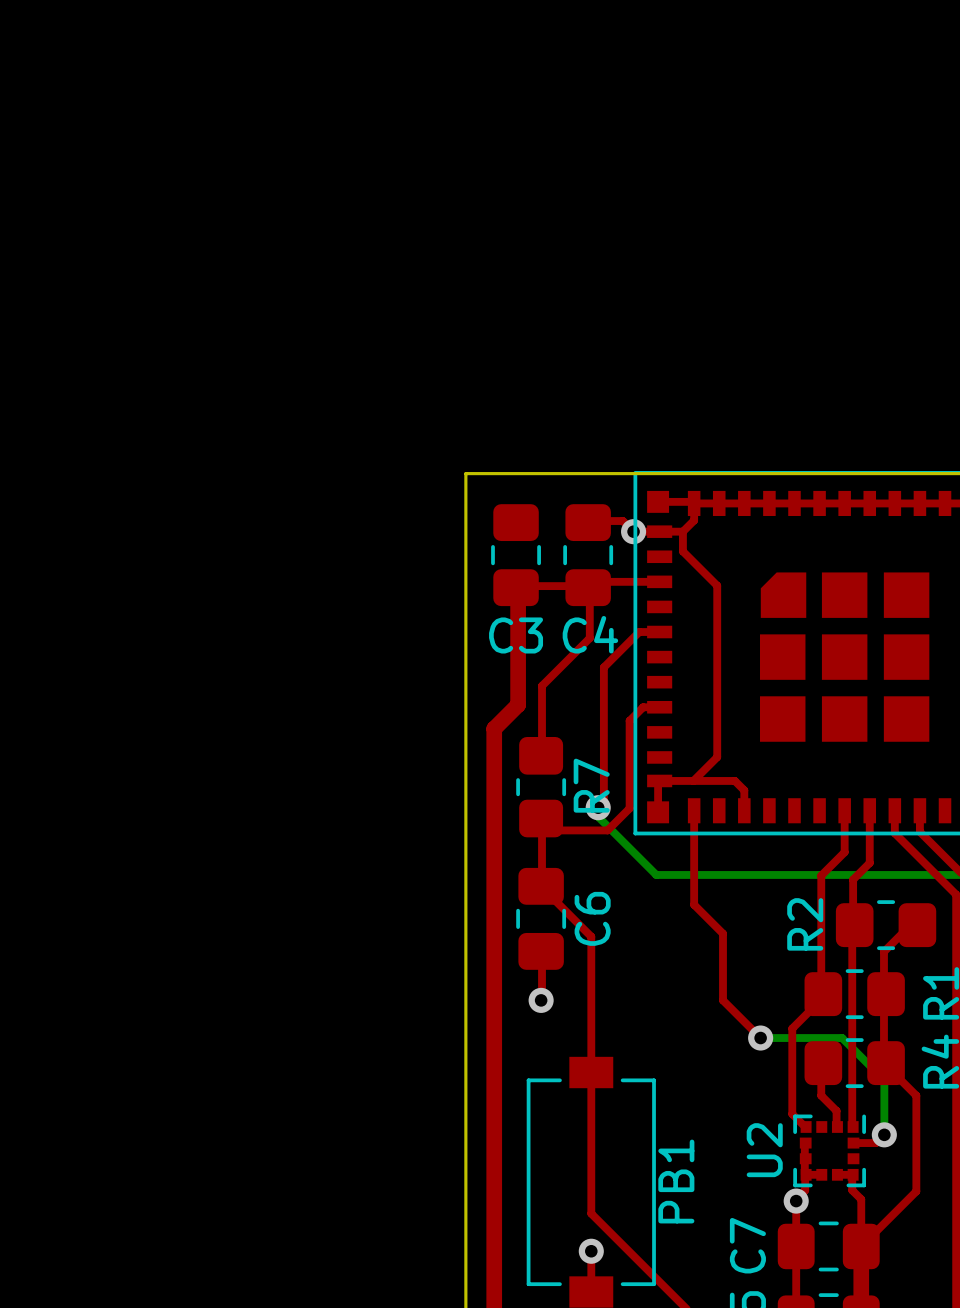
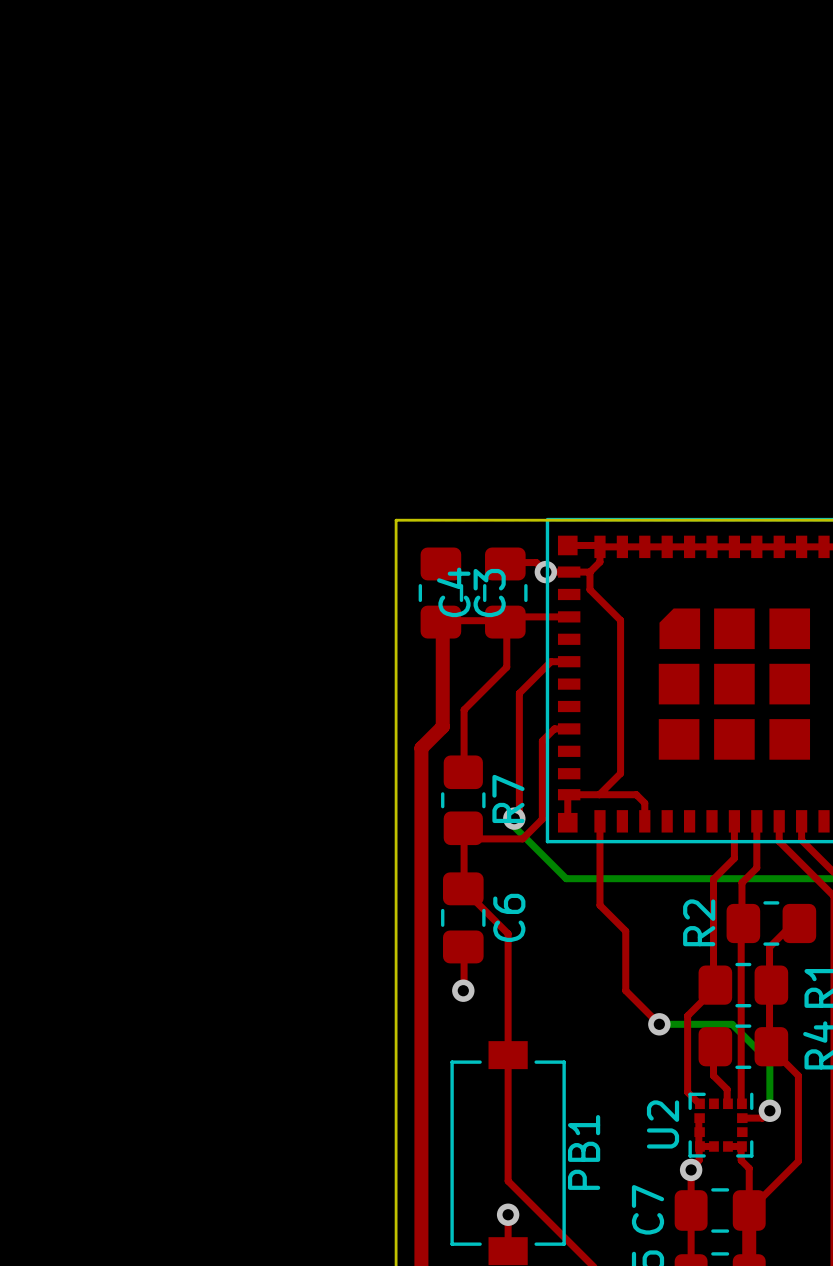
C4 name rotation: 0° (590, 634) -> 90° counterclockwise (453, 592)
C4 name position: C4 (590, 634) -> C4 (453, 592)
C3 name rotation: 0° (516, 635) -> 90° counterclockwise (489, 593)
C3 name position: C3 (516, 635) -> C3 (489, 593)

